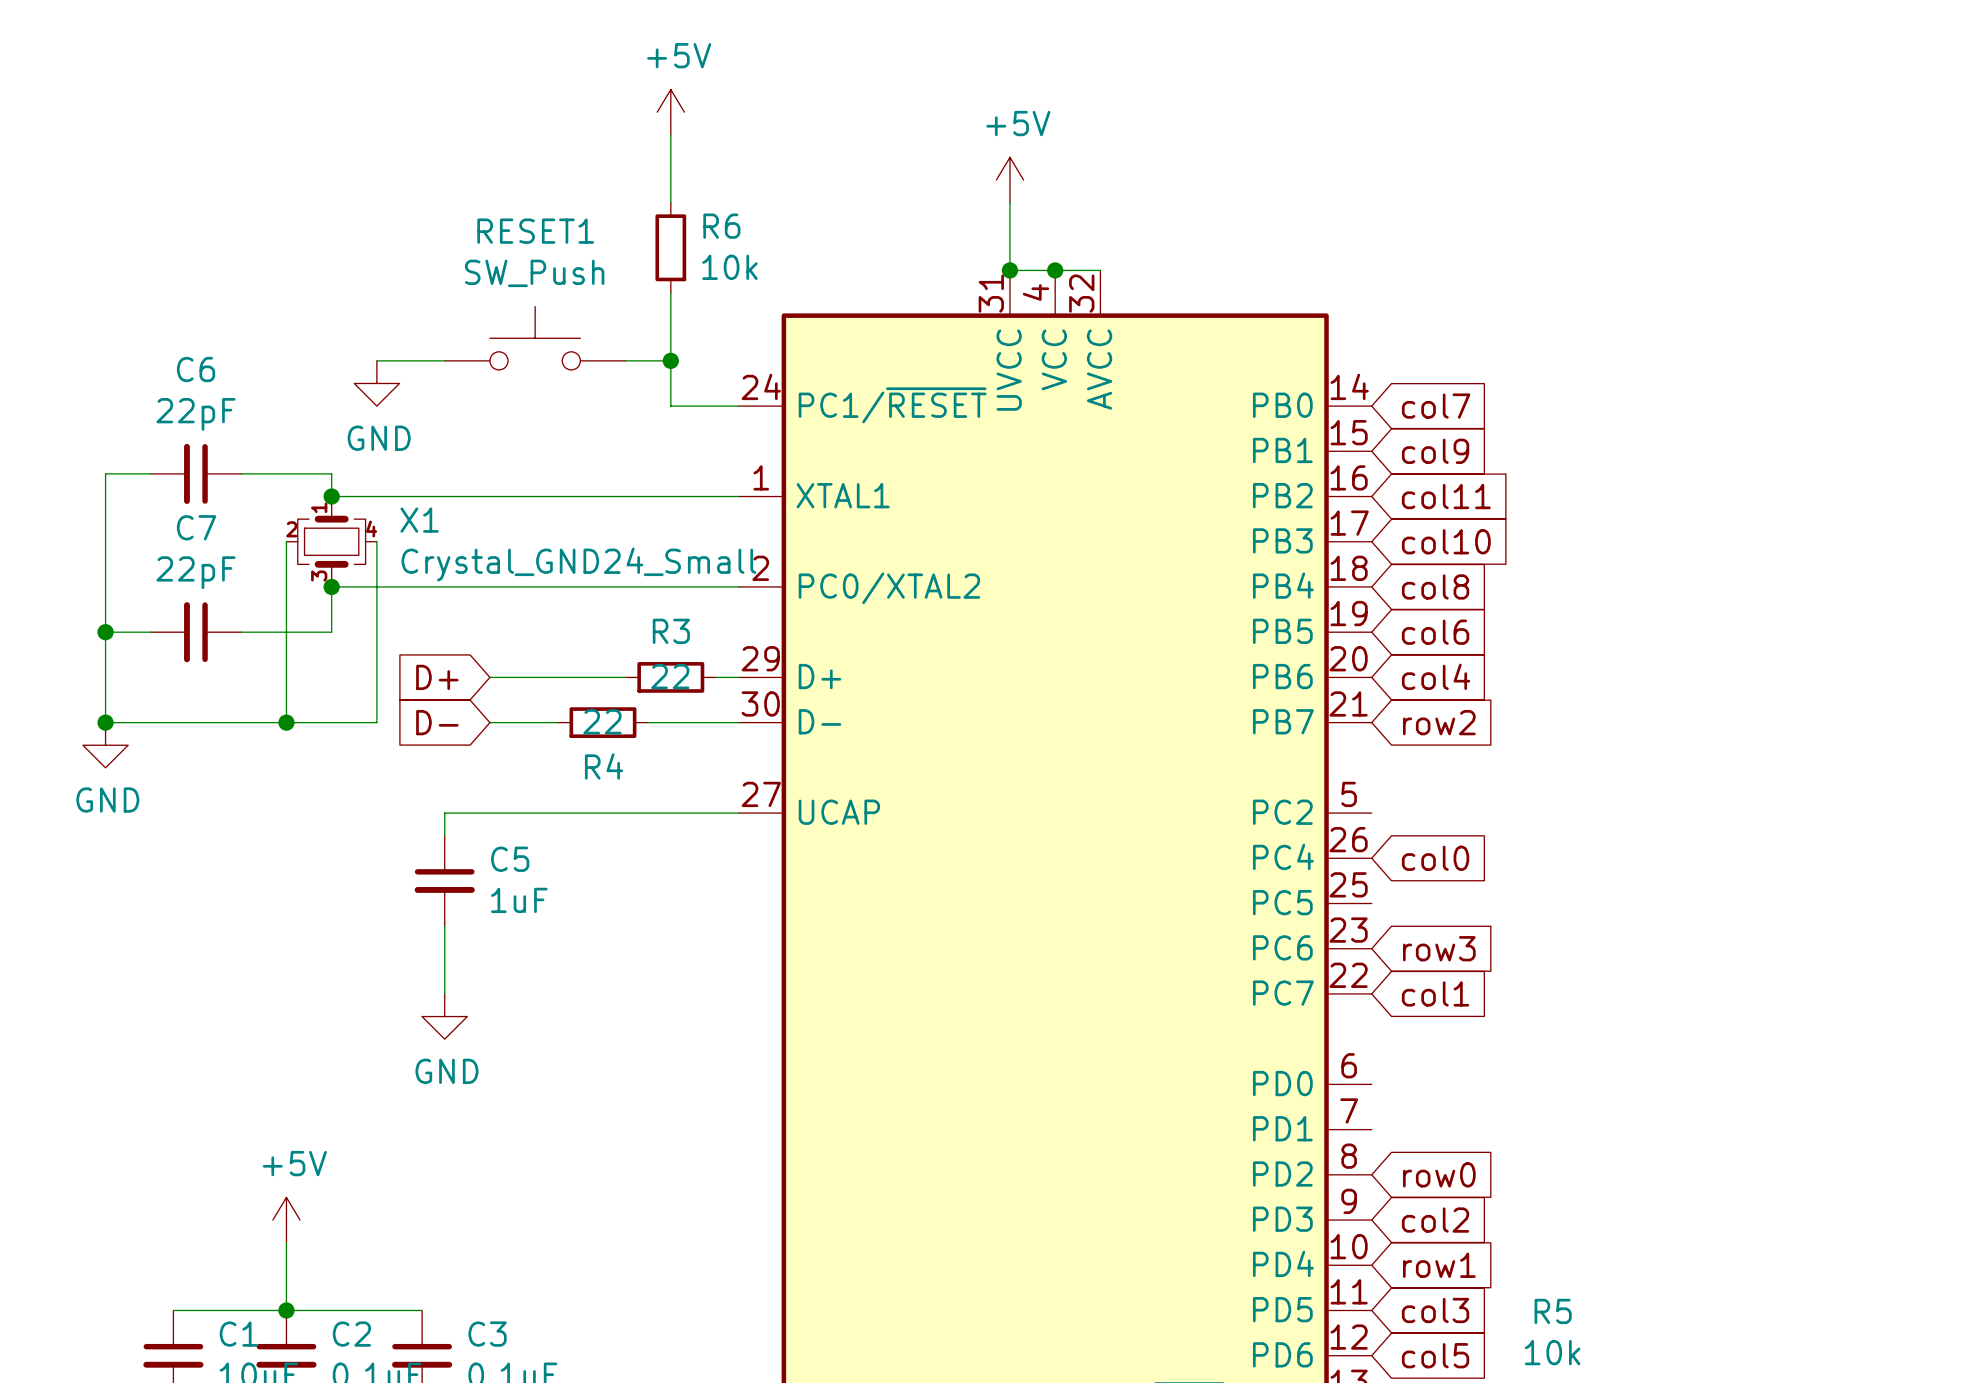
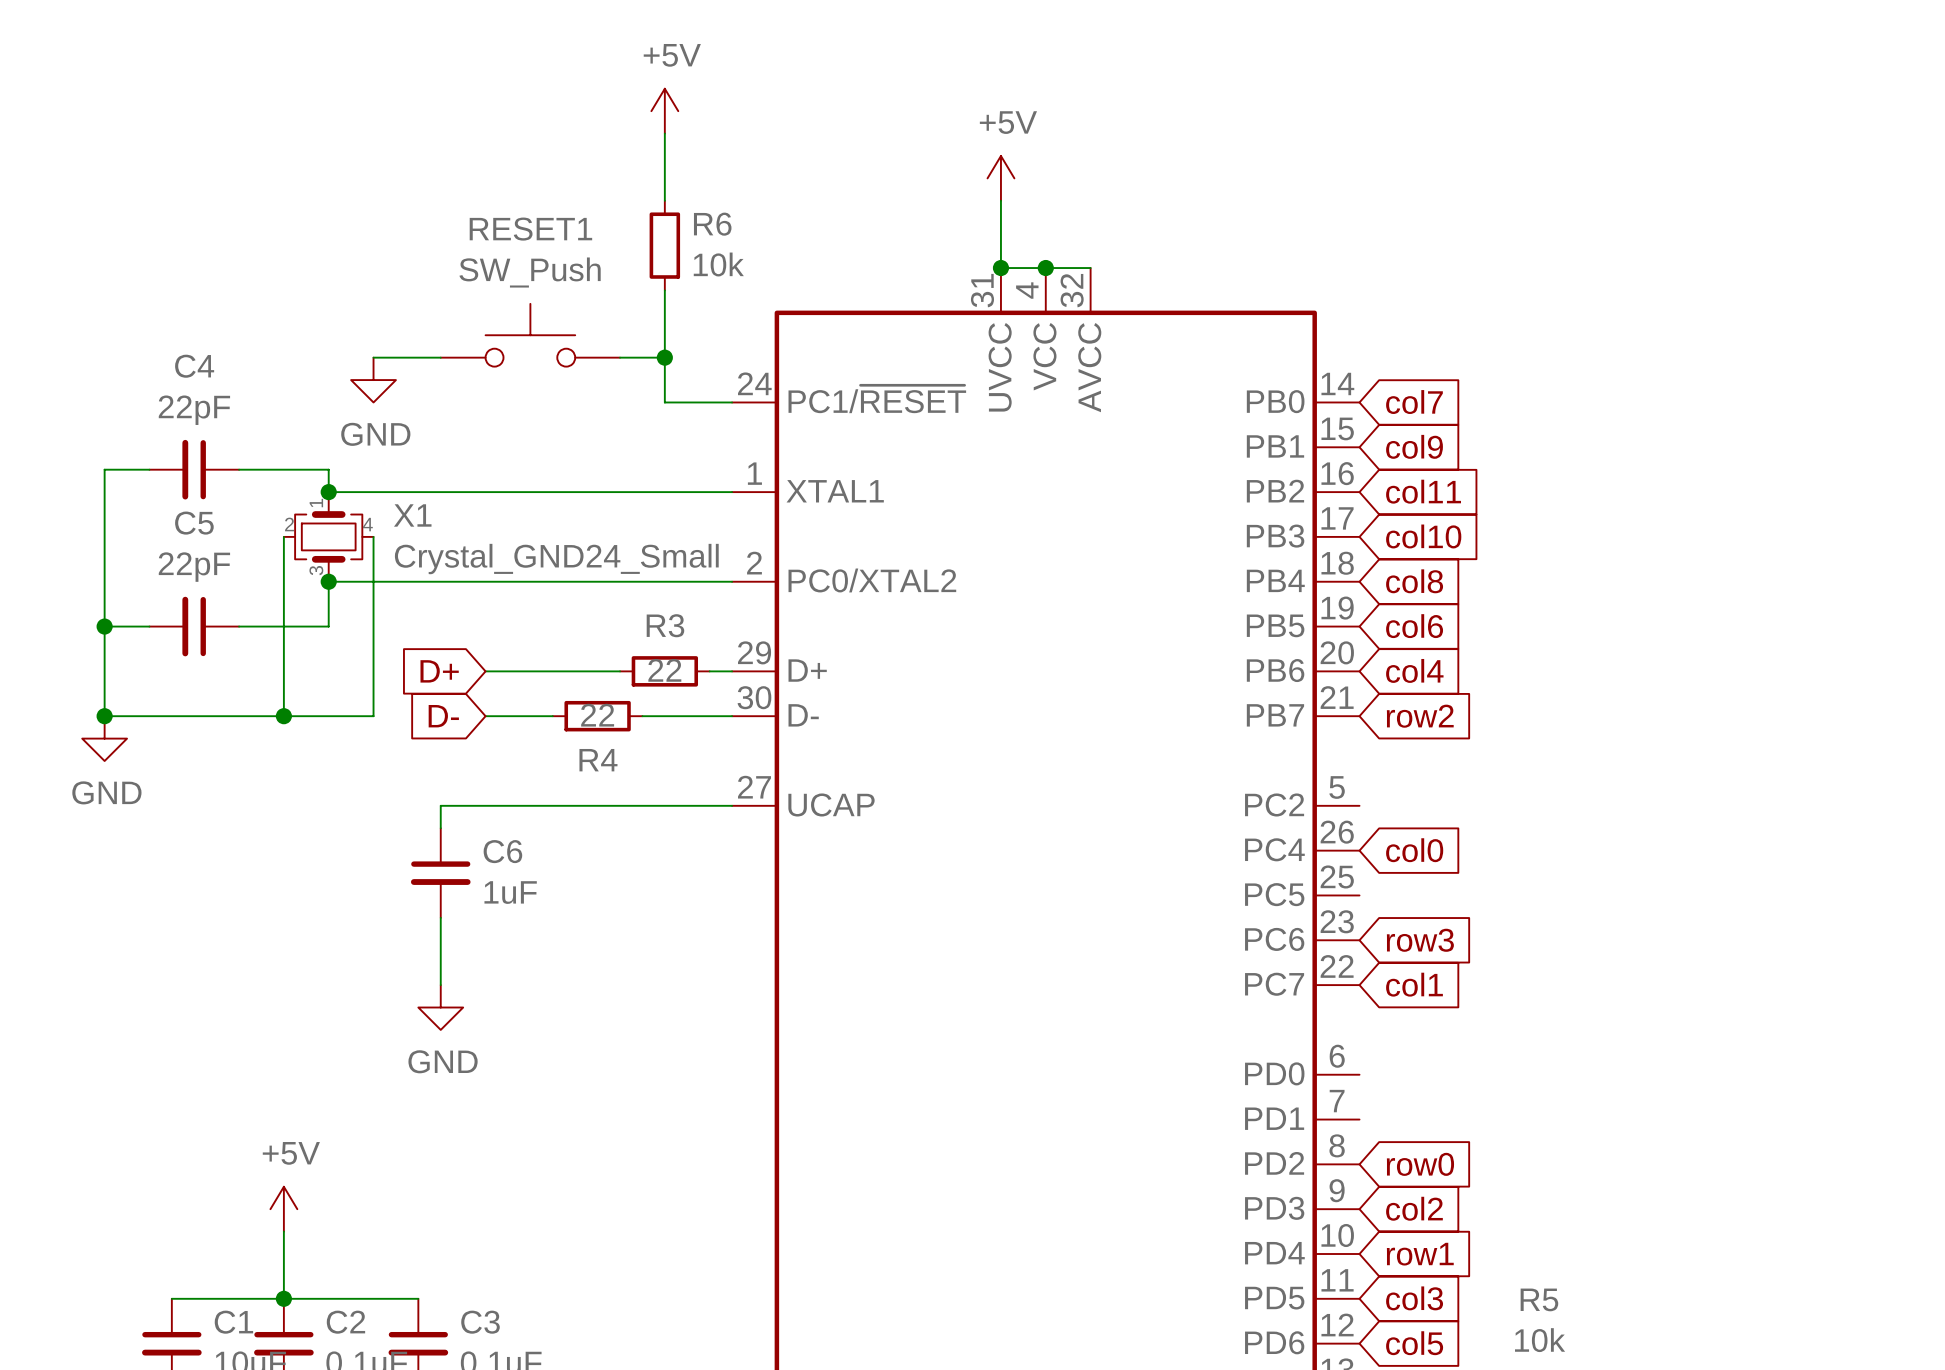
C6 name: C6 (196, 369) -> C4 (194, 366)
C7 name: C7 (196, 527) -> C5 (194, 523)
C5 name: C5 (510, 859) -> C6 (502, 851)

